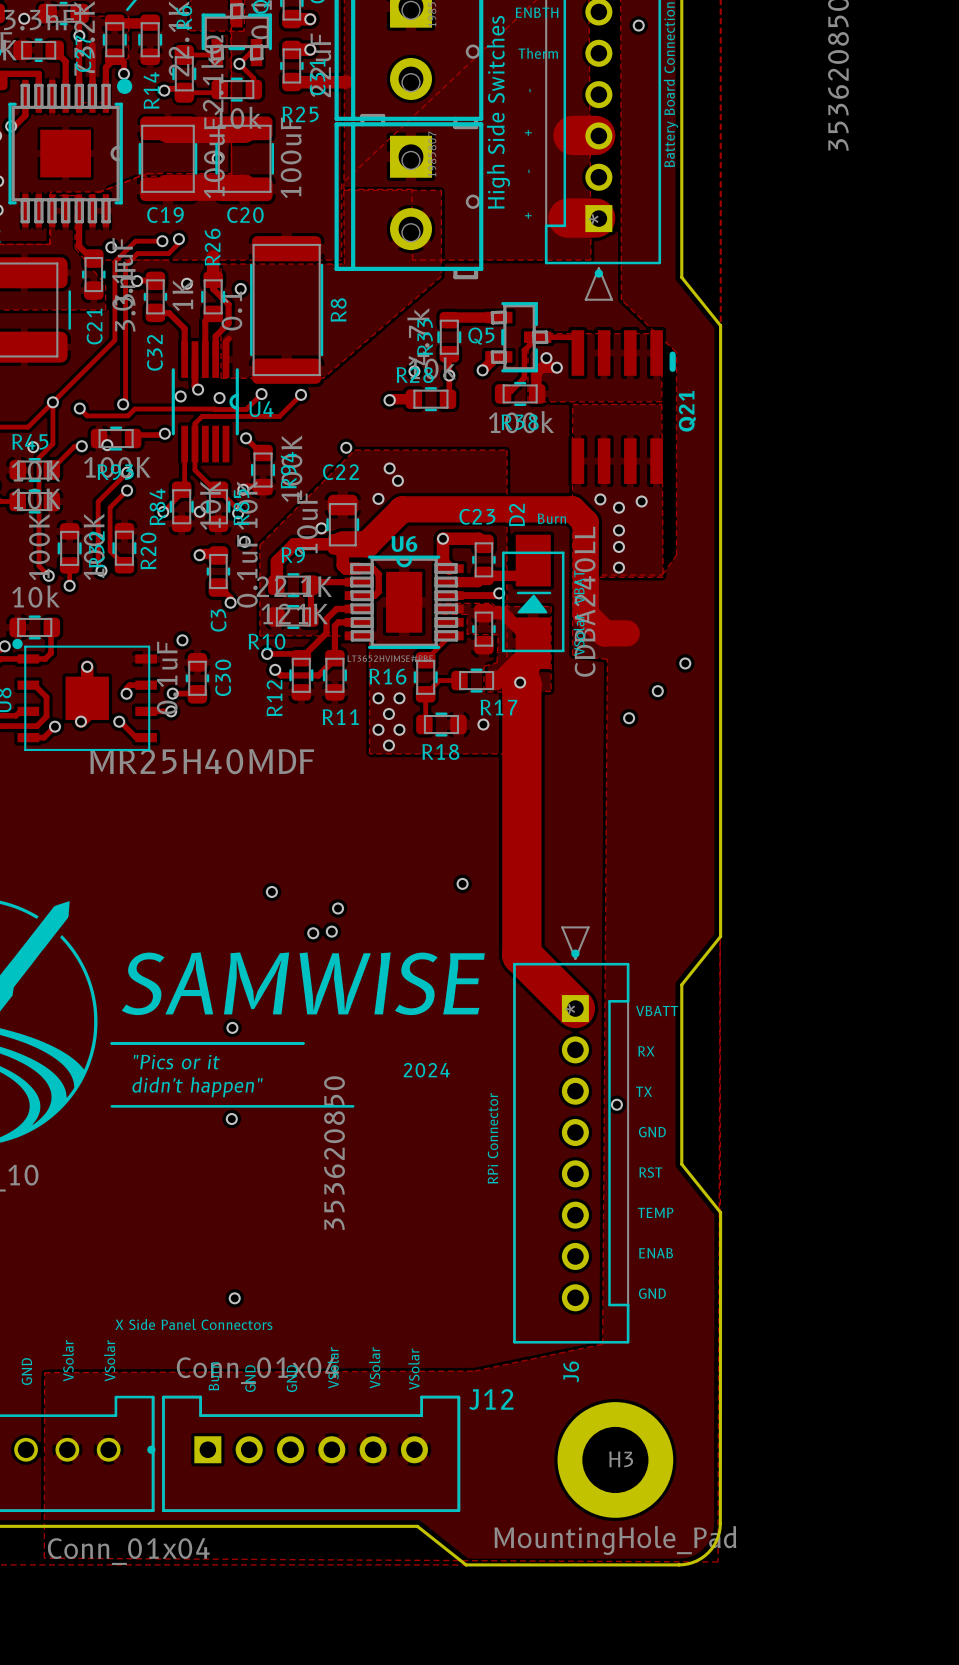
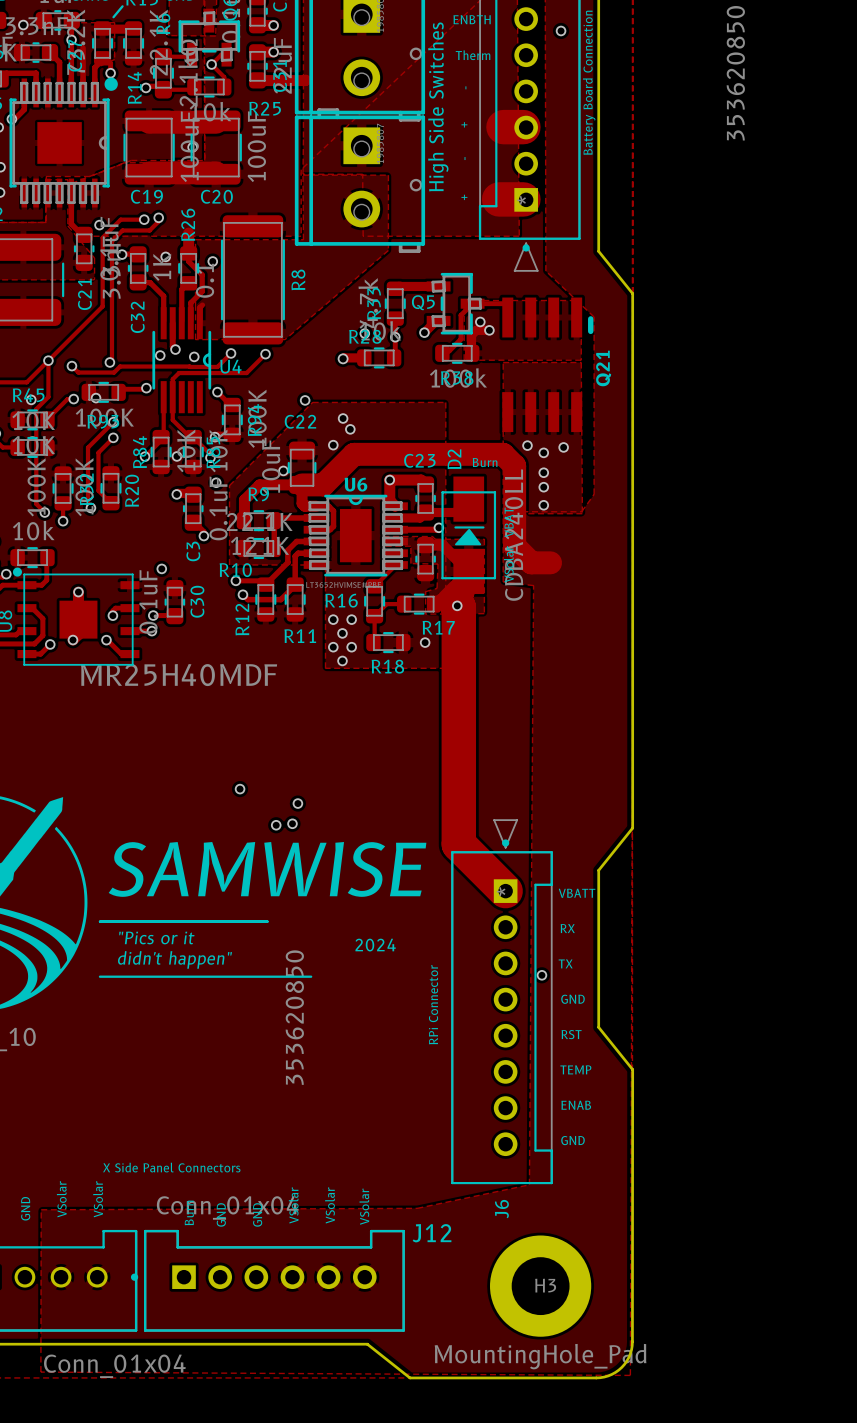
via: (685, 663) -> none
via: (657, 691) -> none
via: (629, 718) -> none
via: (462, 883) -> none
via: (232, 1027) -> none
via: (231, 1119) -> none
via: (234, 1298) -> none

